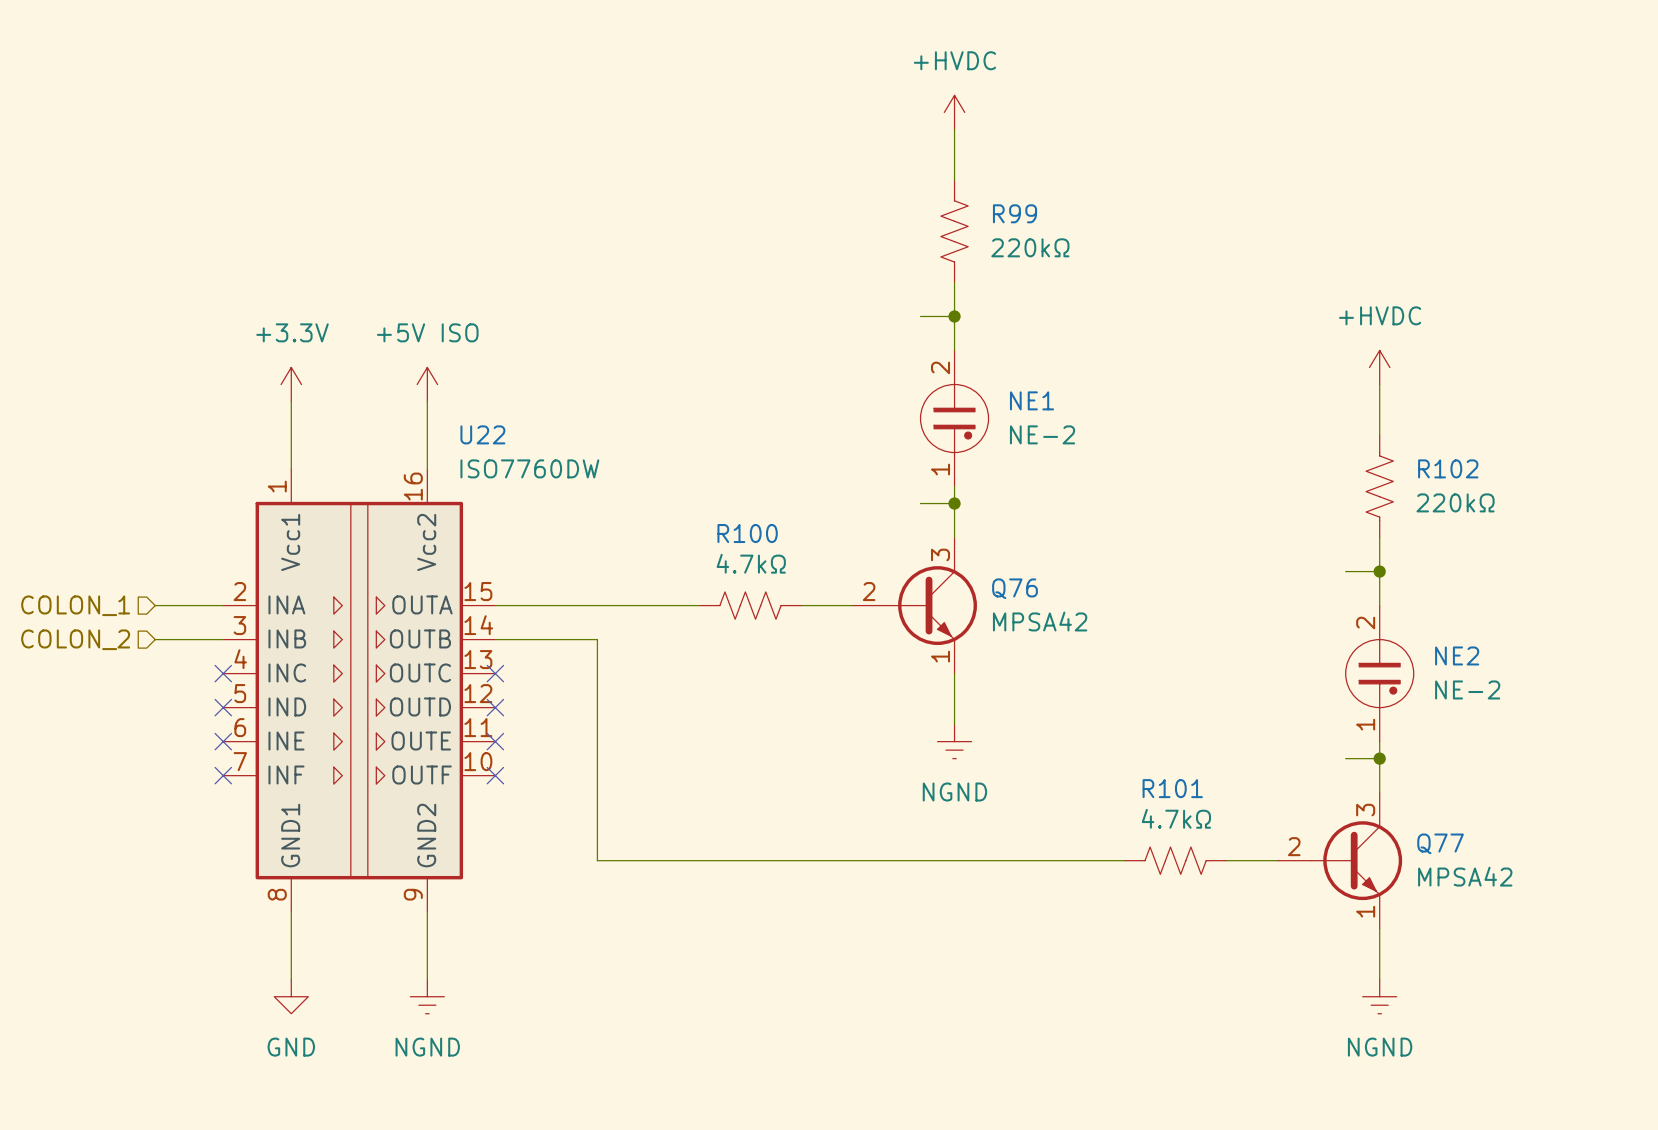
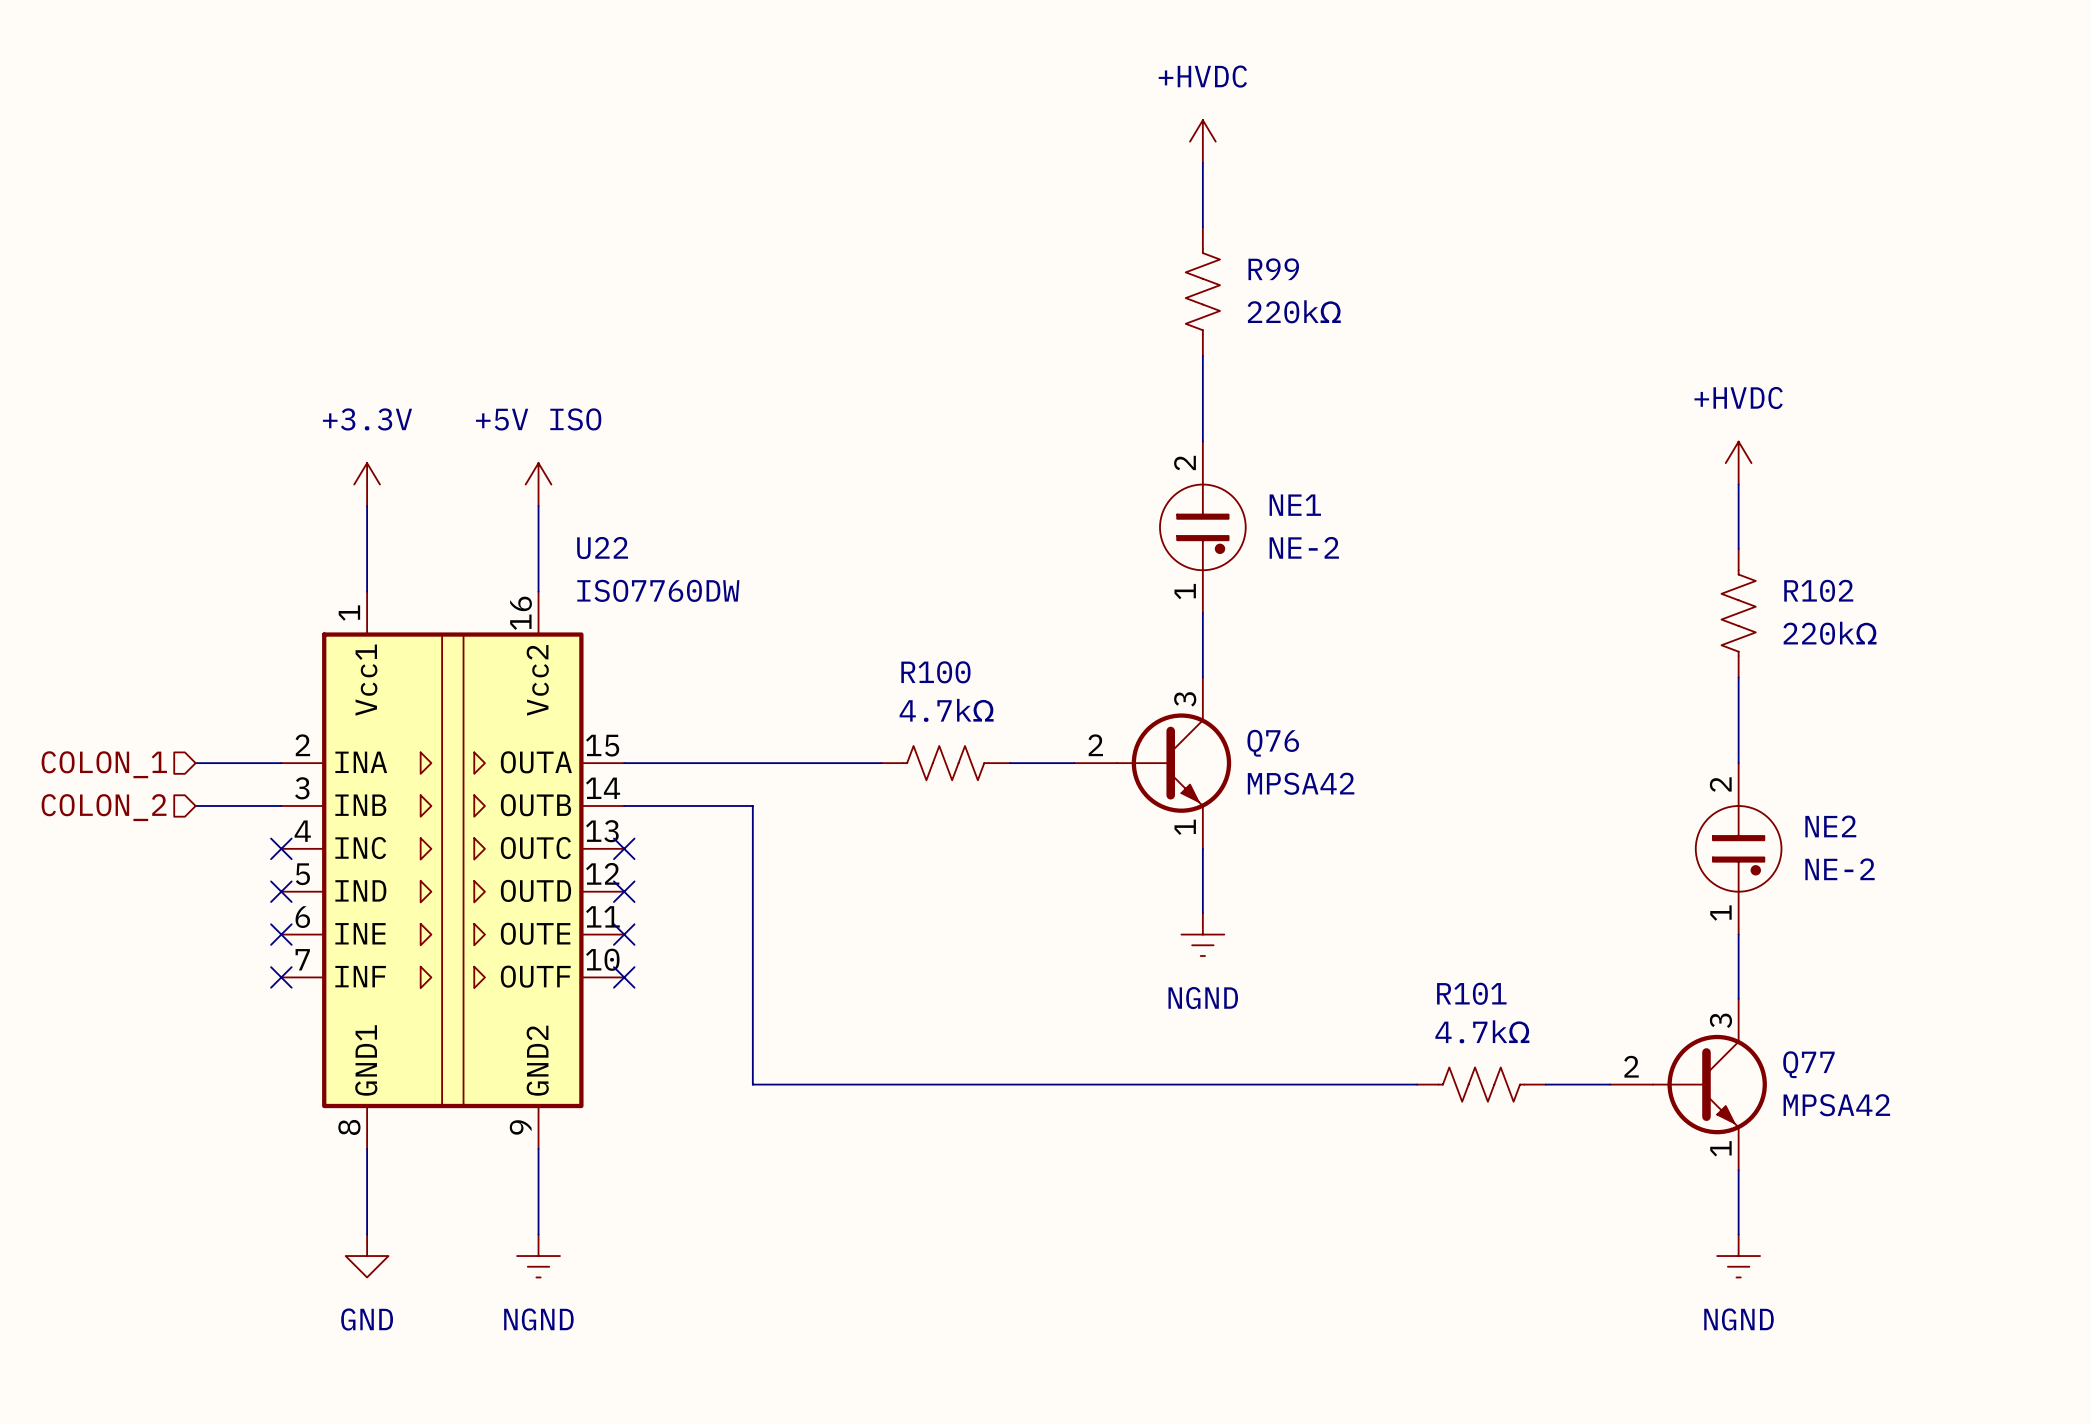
wire: (920, 316) (954, 316) -> none
junction: (954, 316) -> none
wire: (920, 503) (954, 503) -> none
junction: (954, 503) -> none
wire: (1345, 571) (1379, 571) -> none
junction: (1379, 571) -> none
wire: (1345, 758) (1379, 758) -> none
junction: (1379, 758) -> none

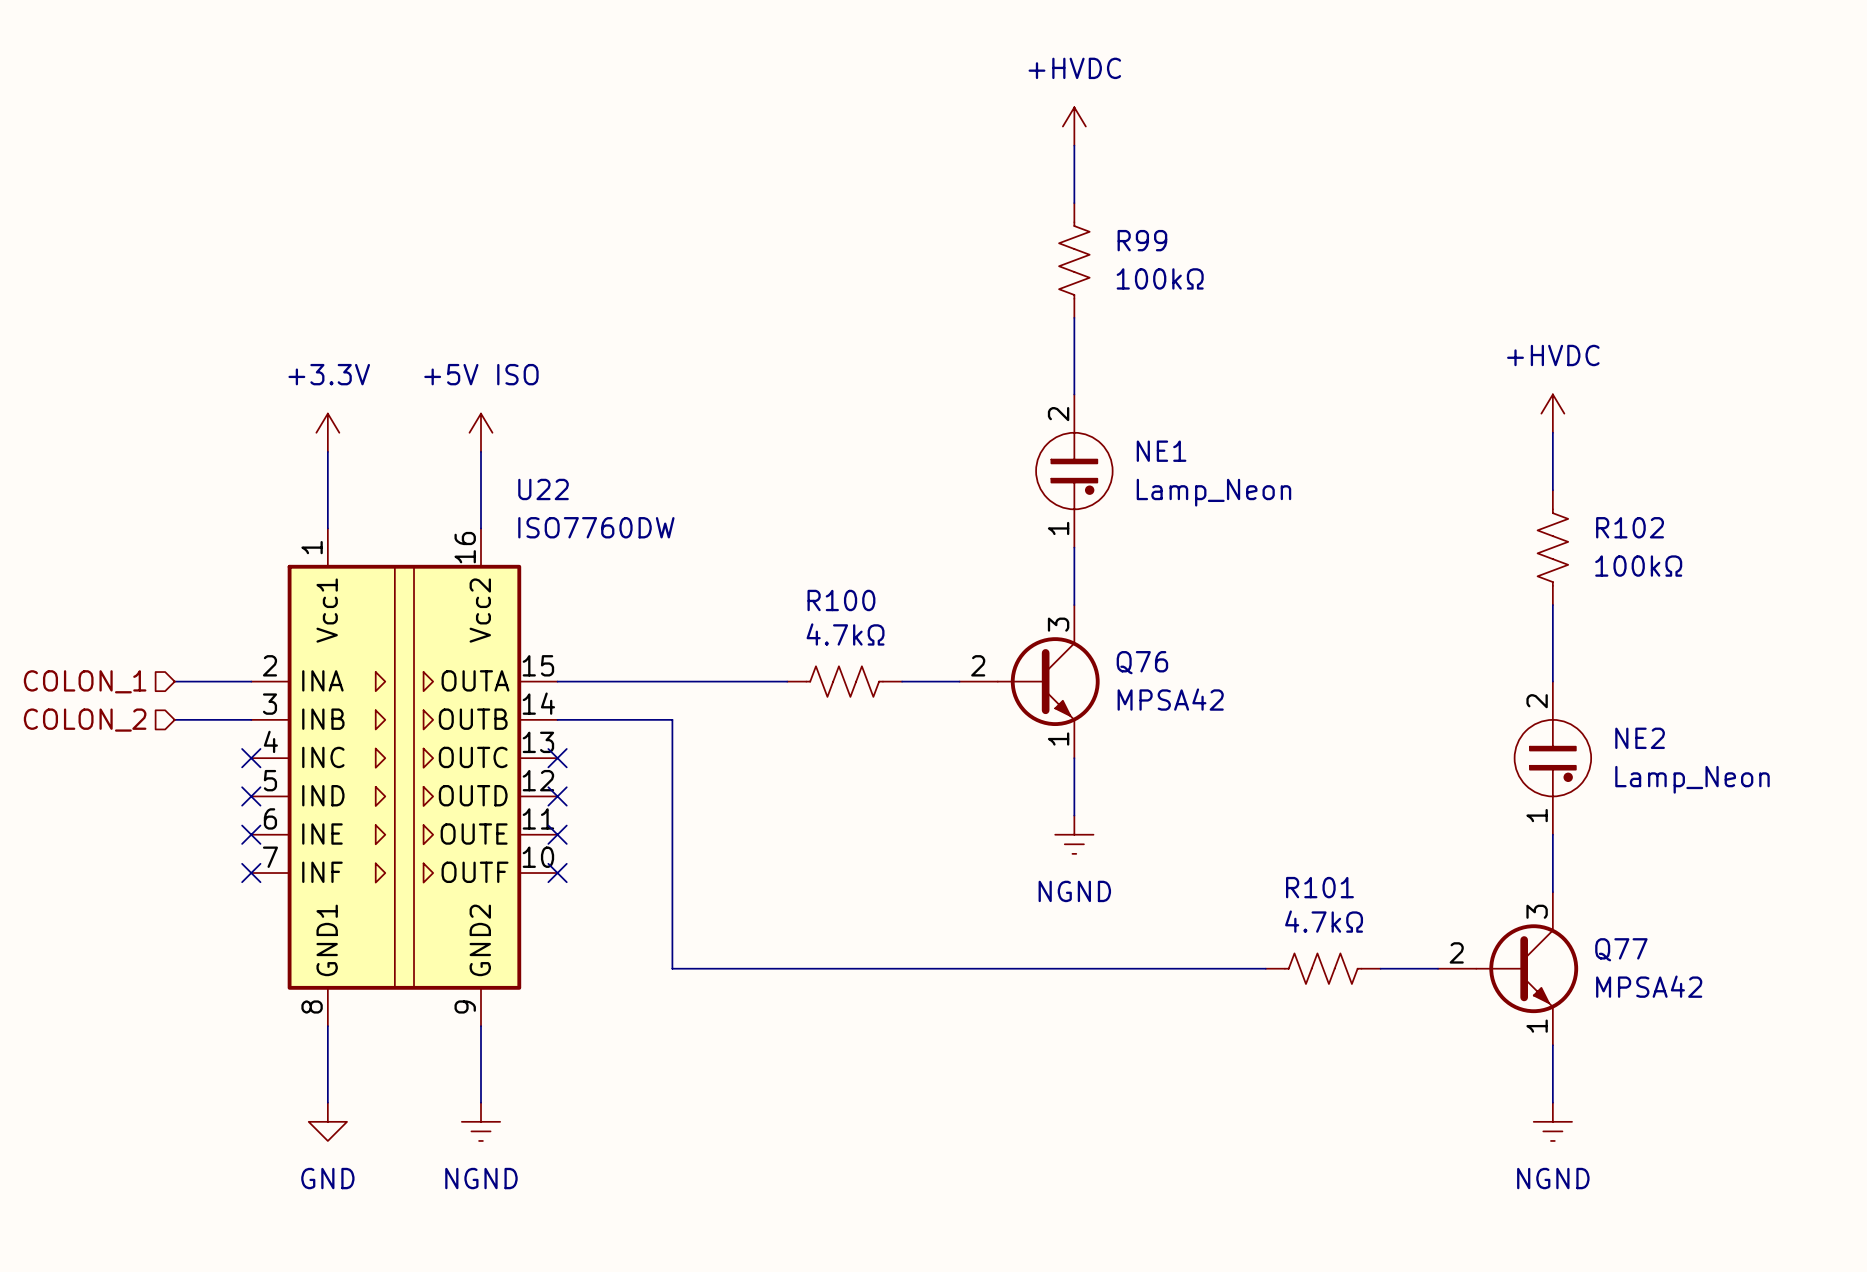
R99 value: 220kΩ (1294, 311) -> 100kΩ (1160, 278)
NE1 value: NE-2 (1304, 547) -> Lamp_Neon (1213, 492)
R102 value: 220kΩ (1830, 633) -> 100kΩ (1638, 566)
NE2 value: NE-2 (1840, 869) -> Lamp_Neon (1692, 779)

